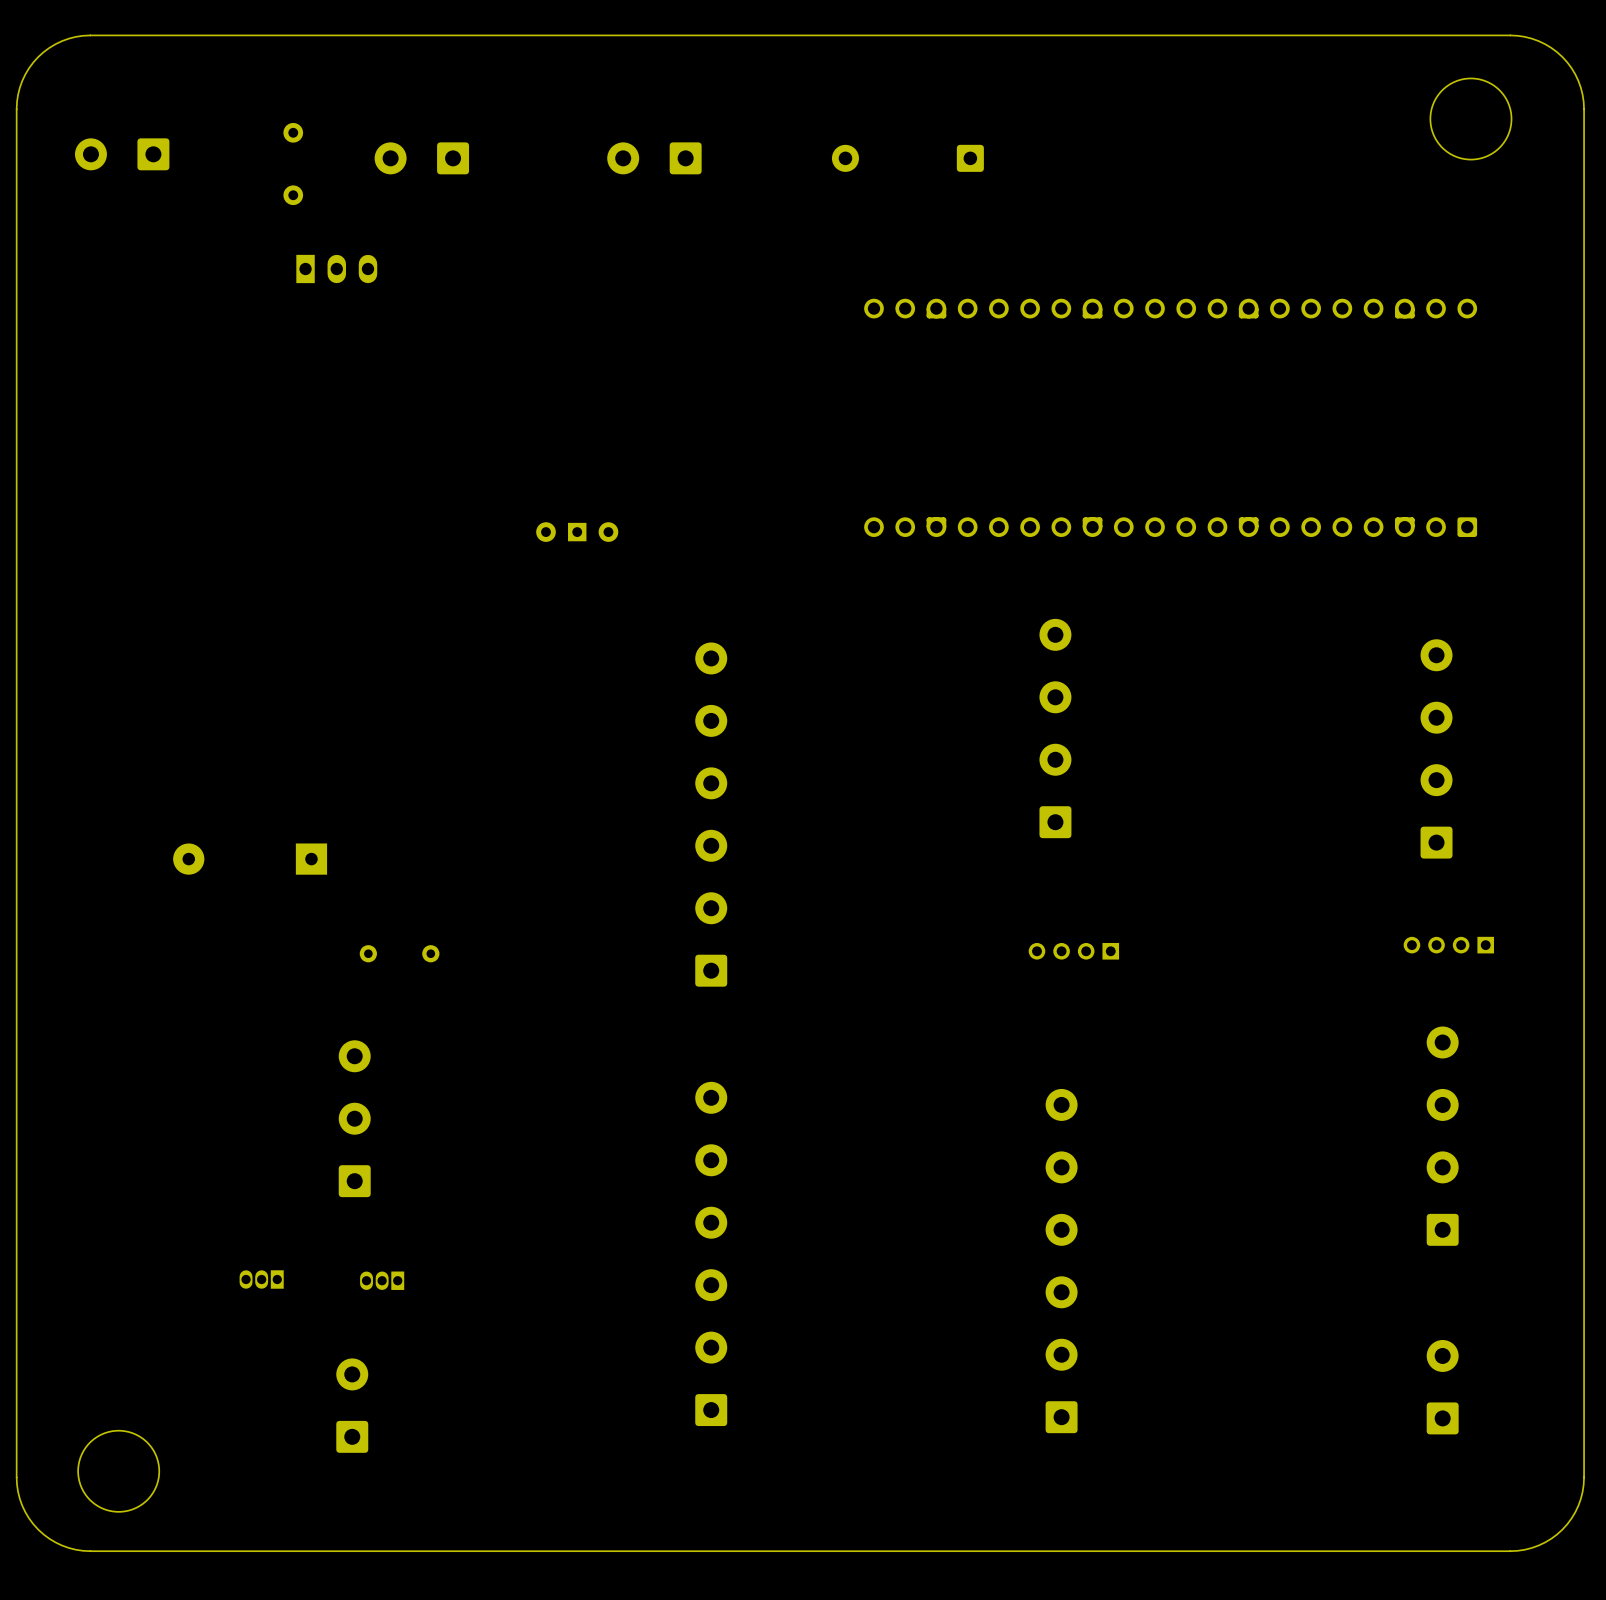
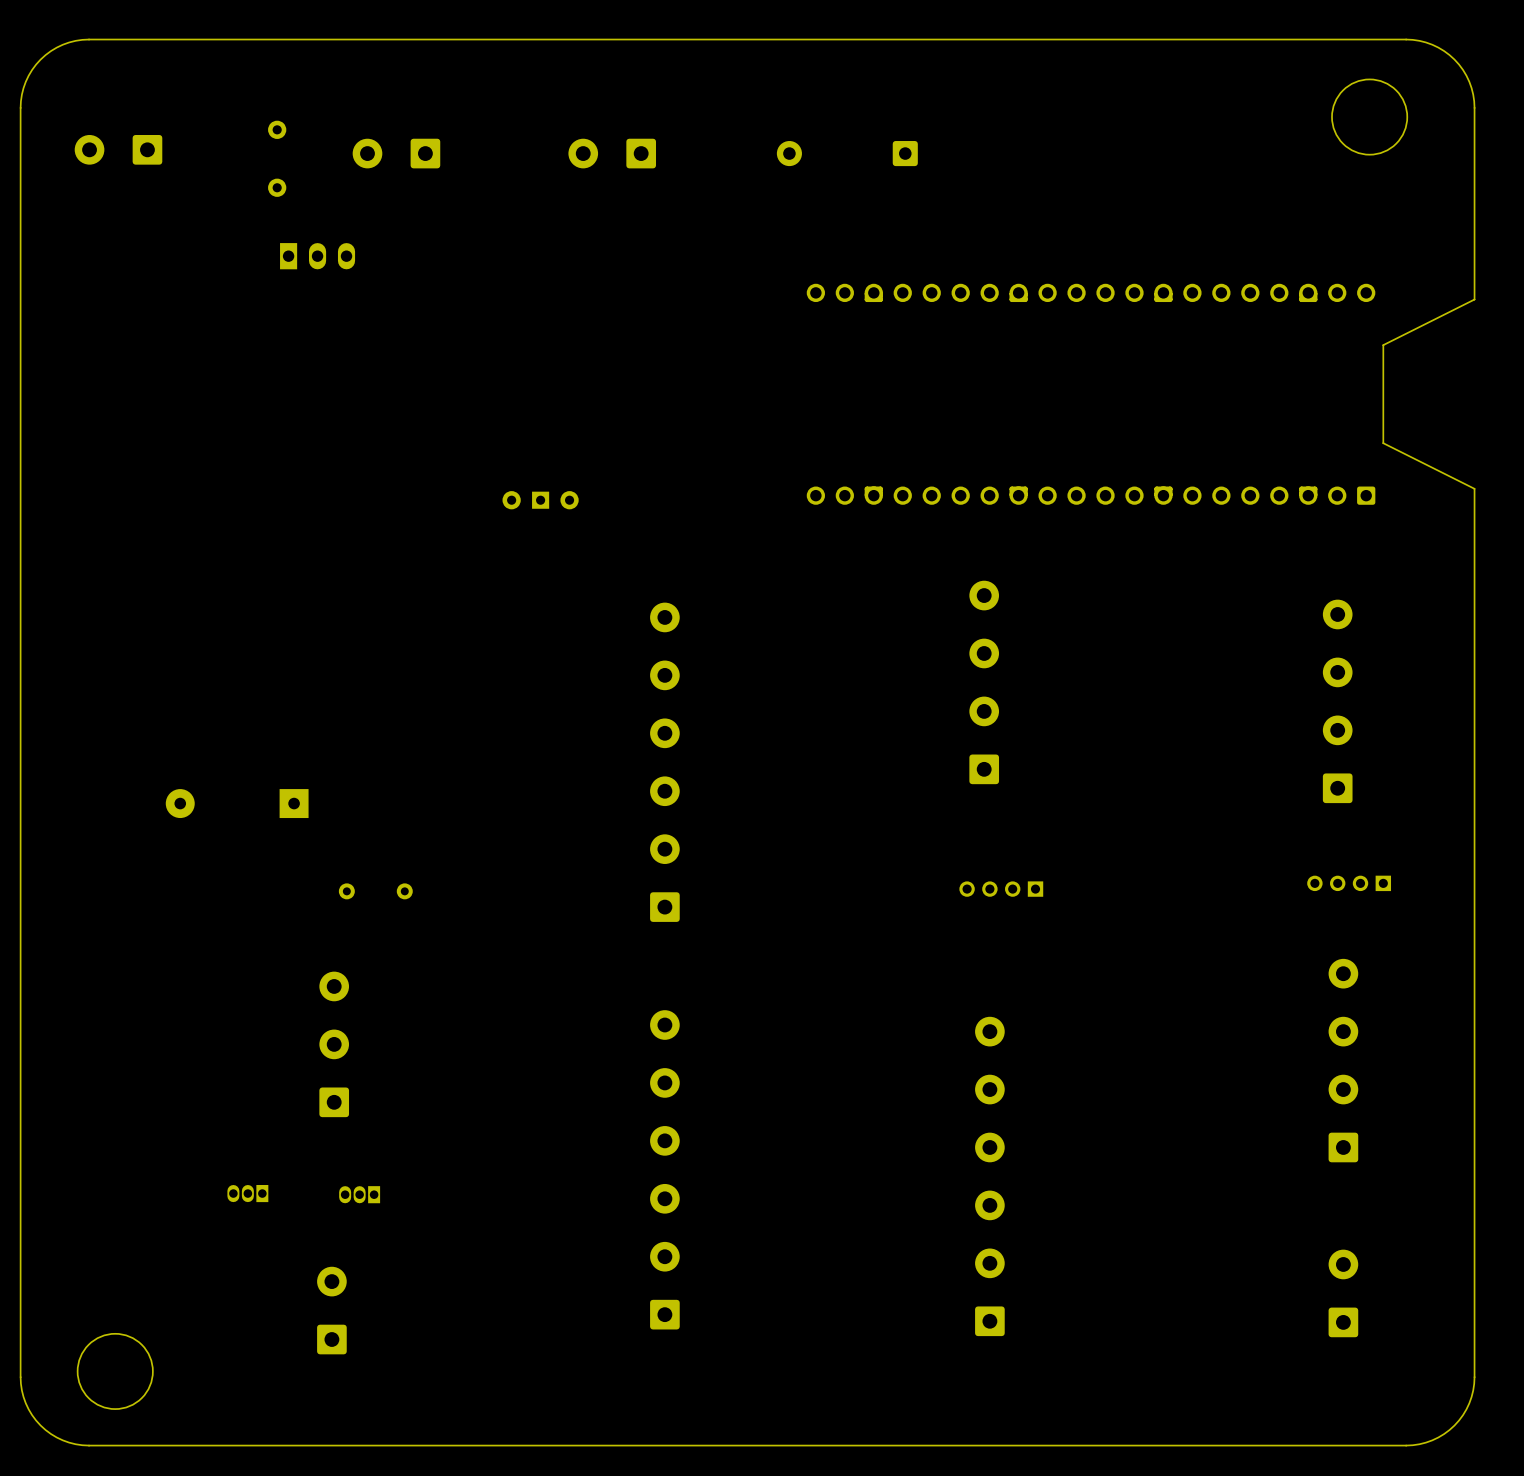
board edge: (1584, 315) (1584, 519) -> (1474, 299) (1383, 345) (1383, 443) (1474, 488)

